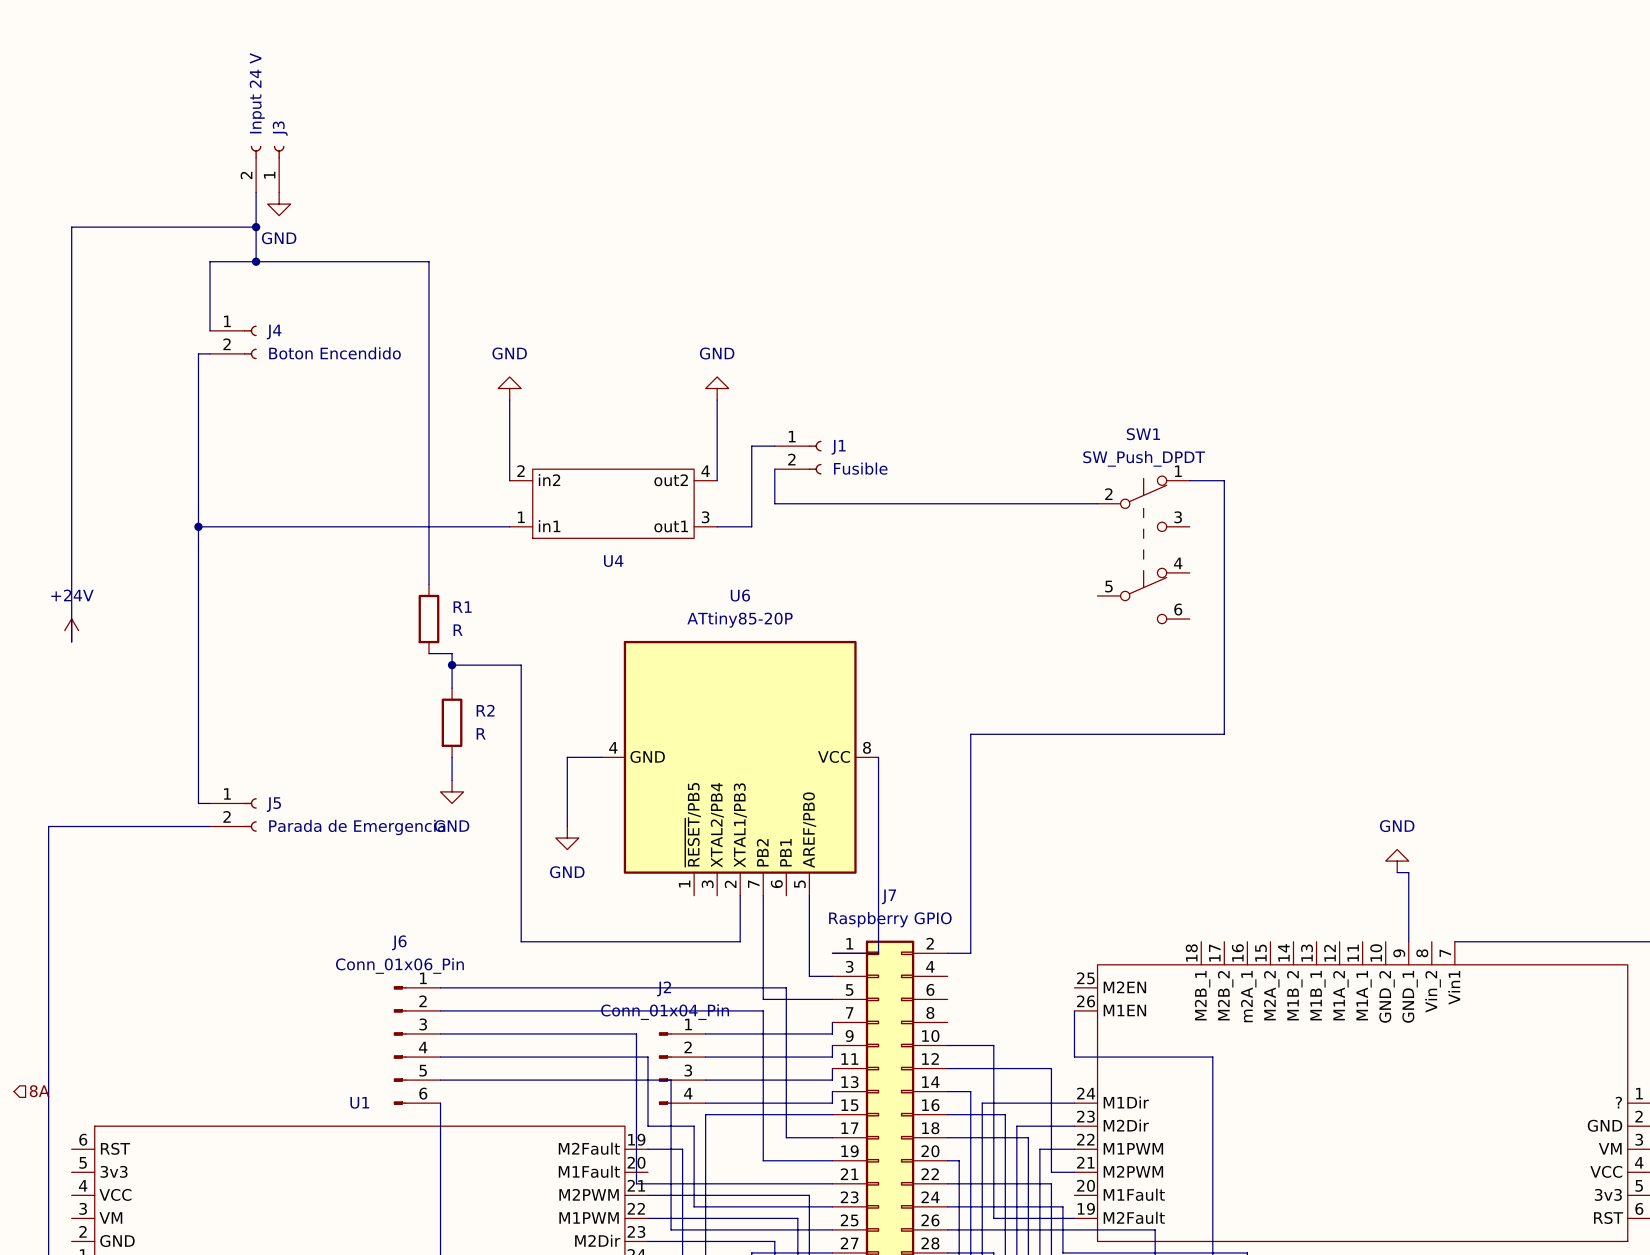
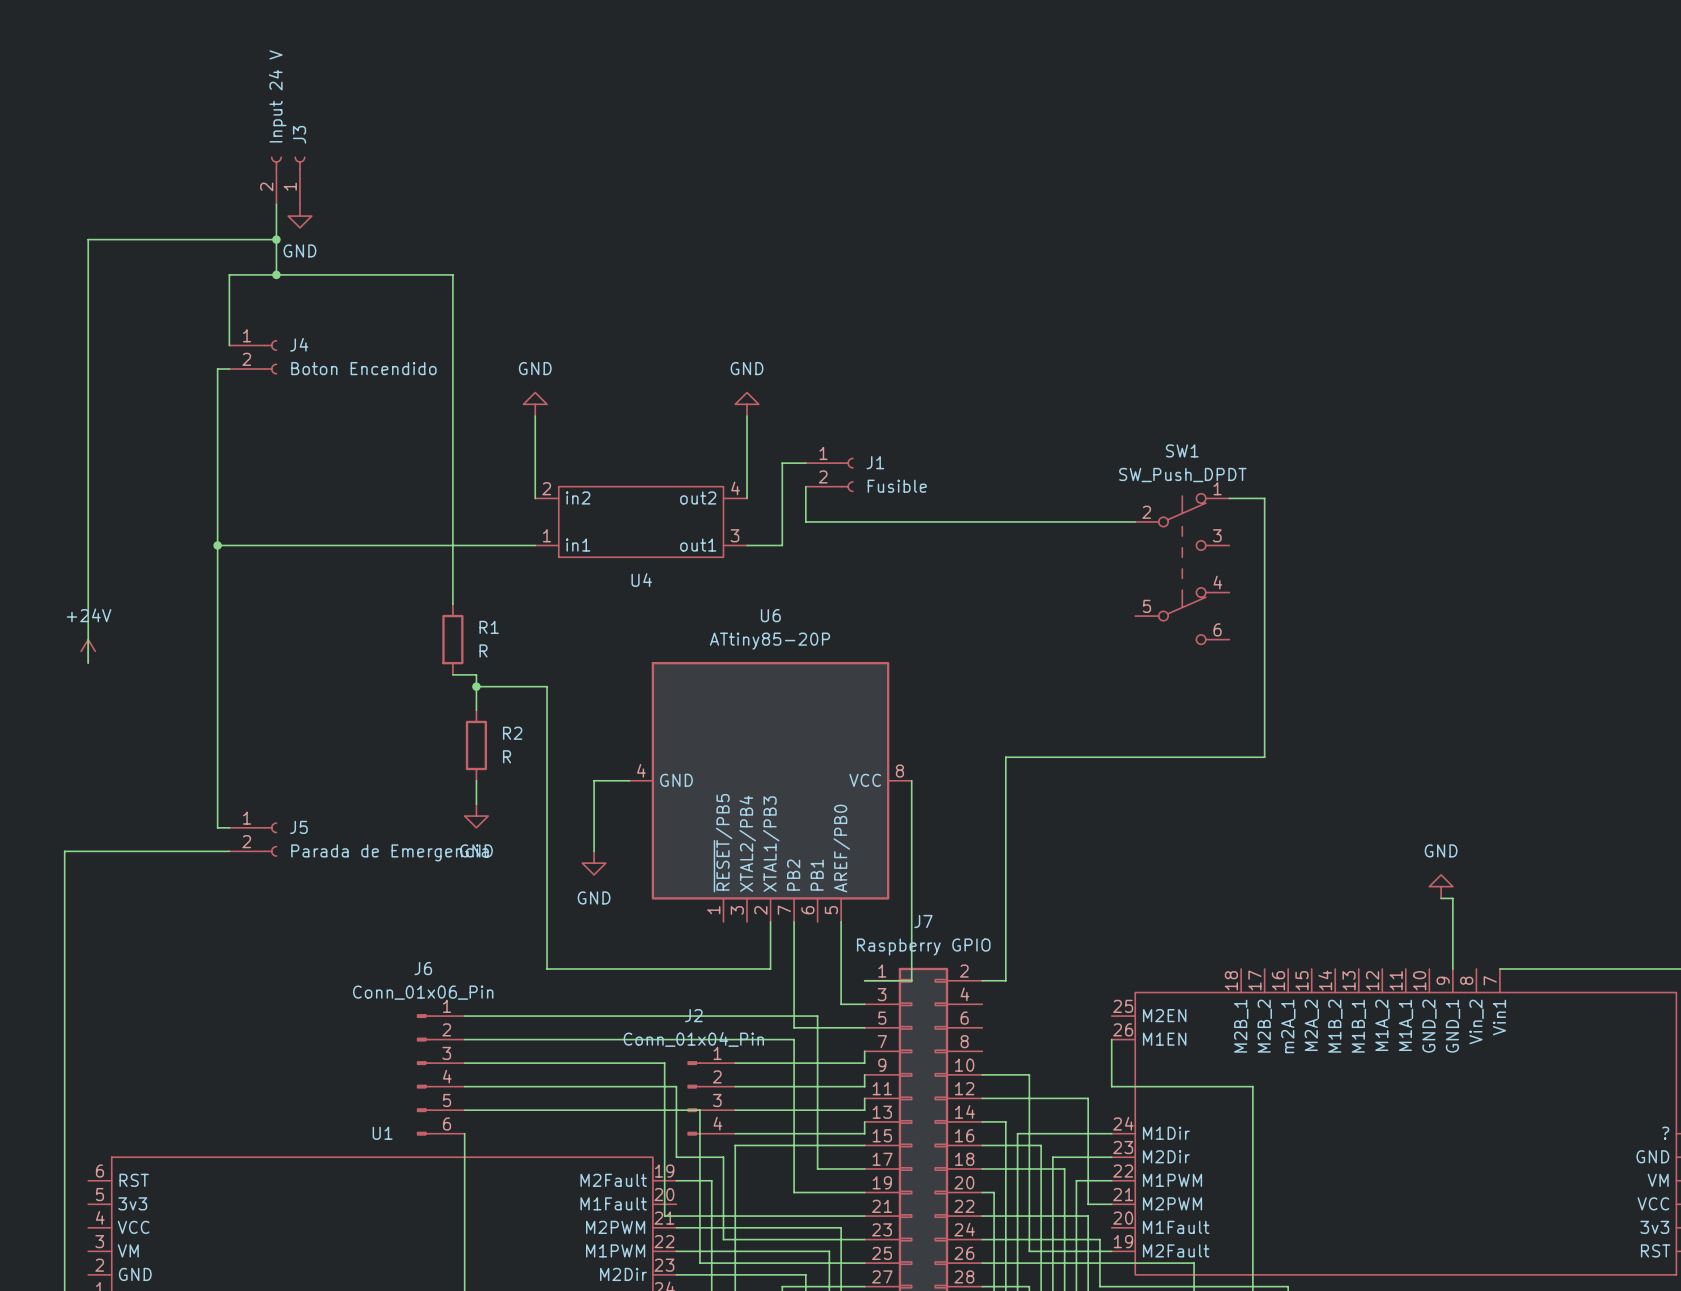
hierarchical label: 8A (39, 1091) -> none

